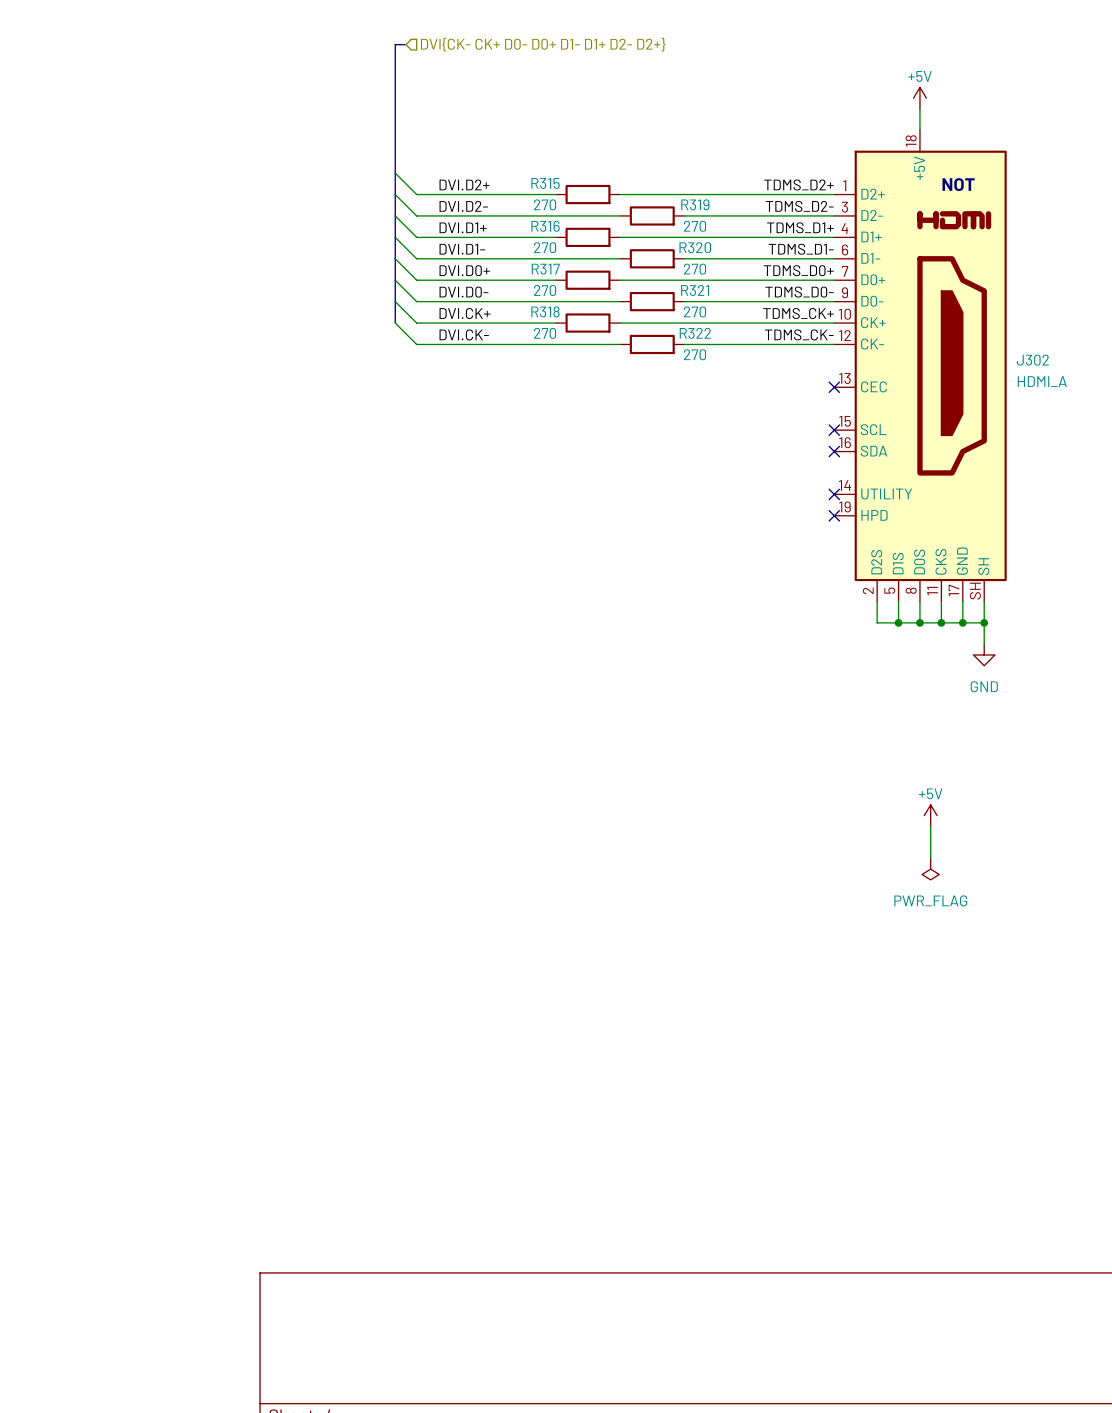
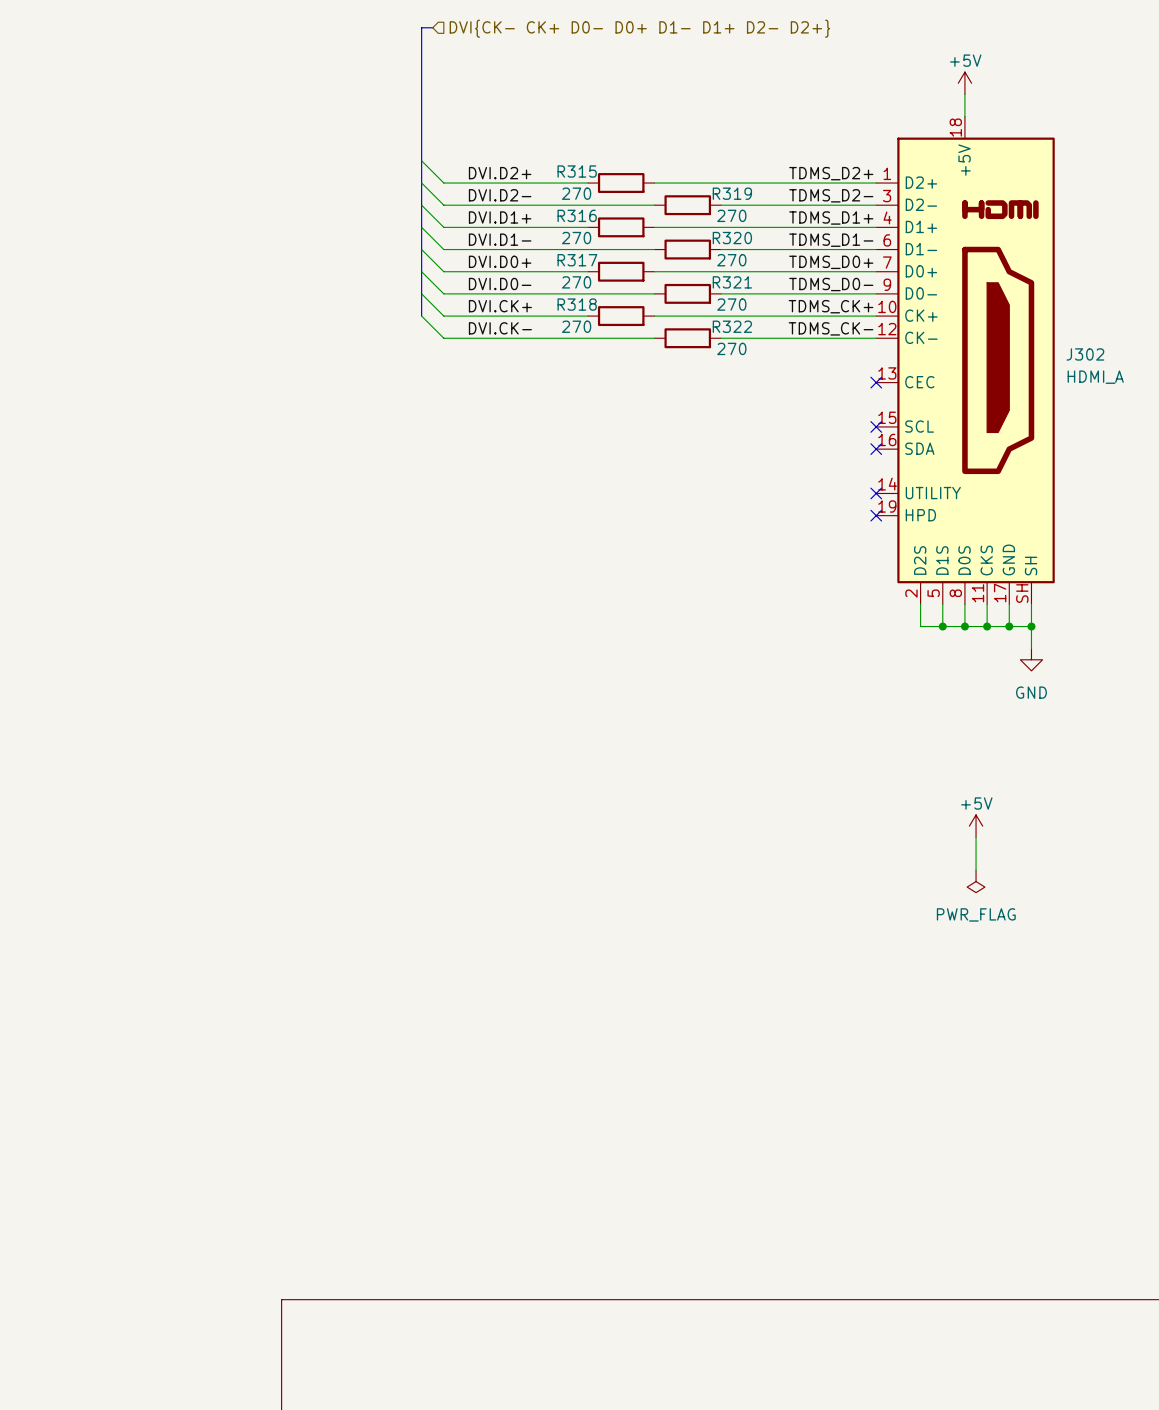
text: NOT (958, 184) -> none

